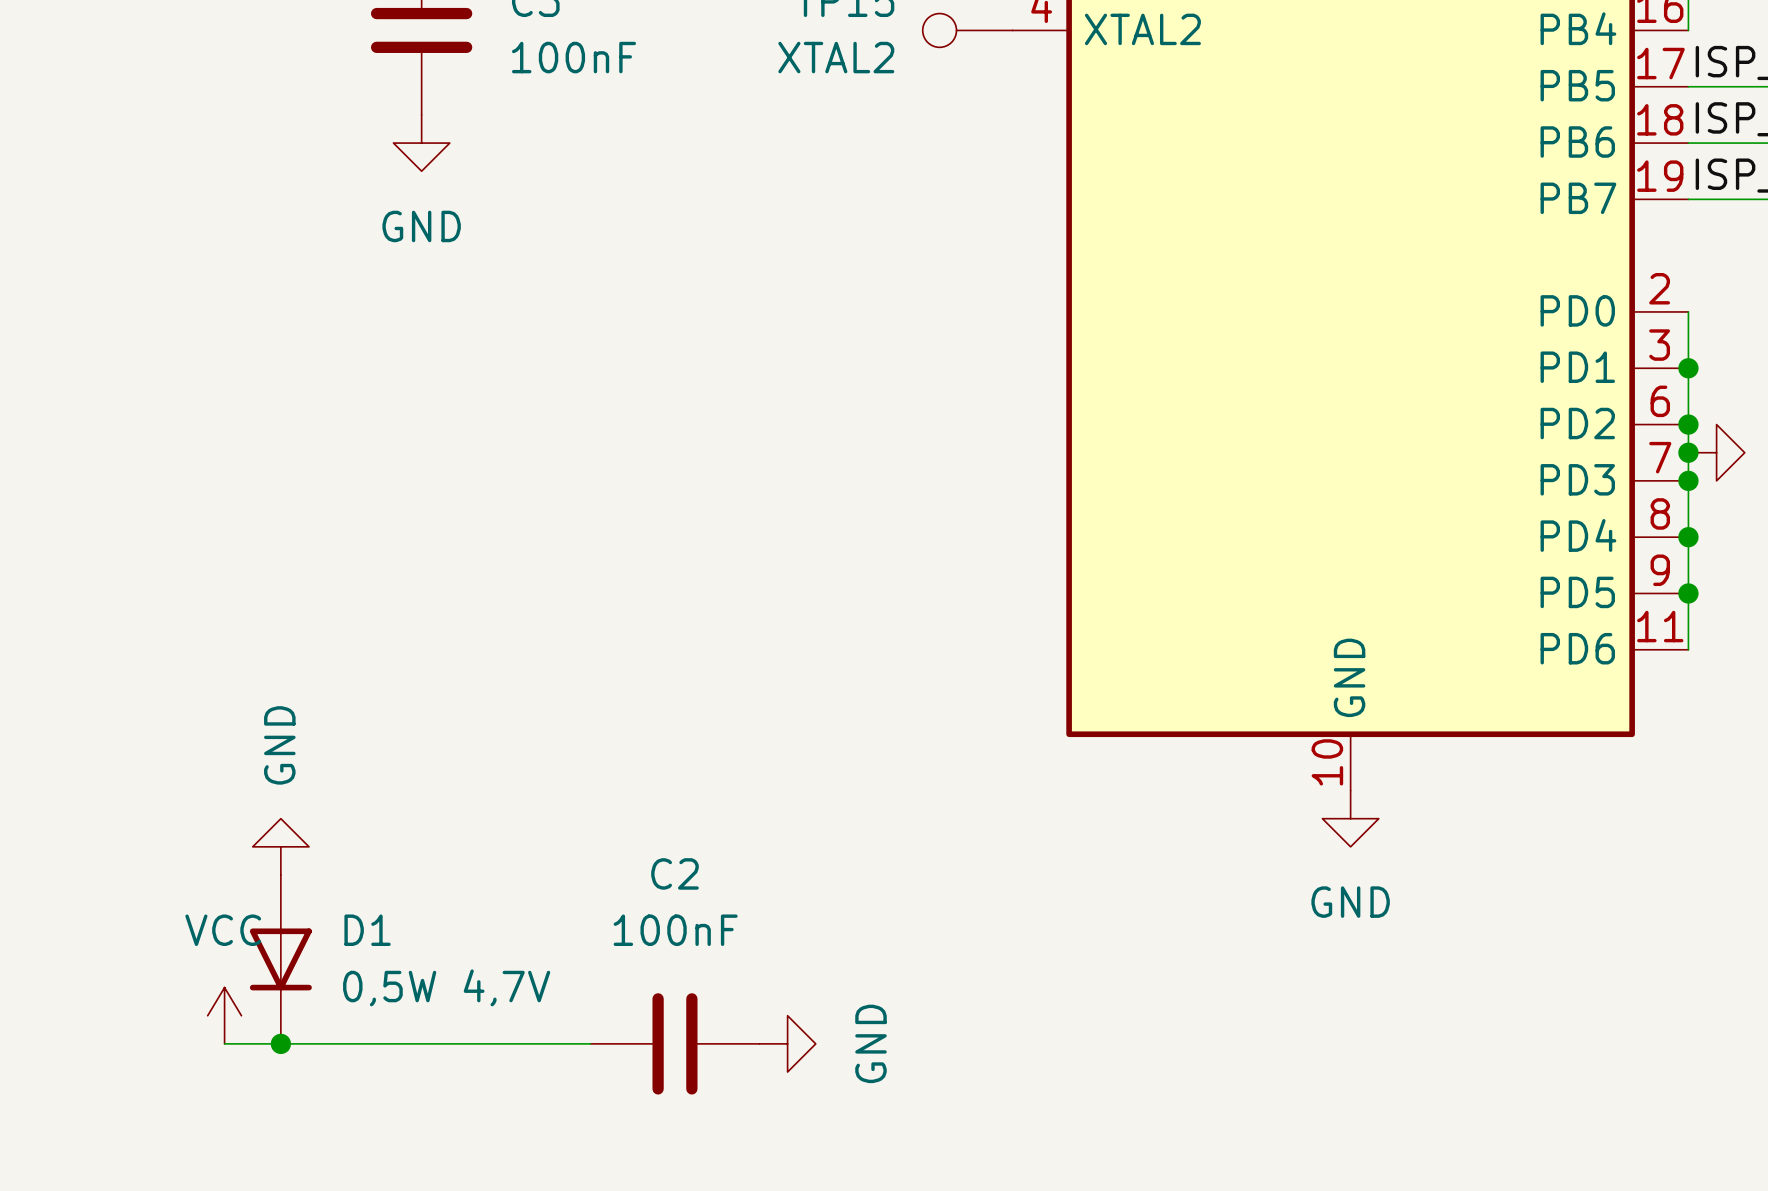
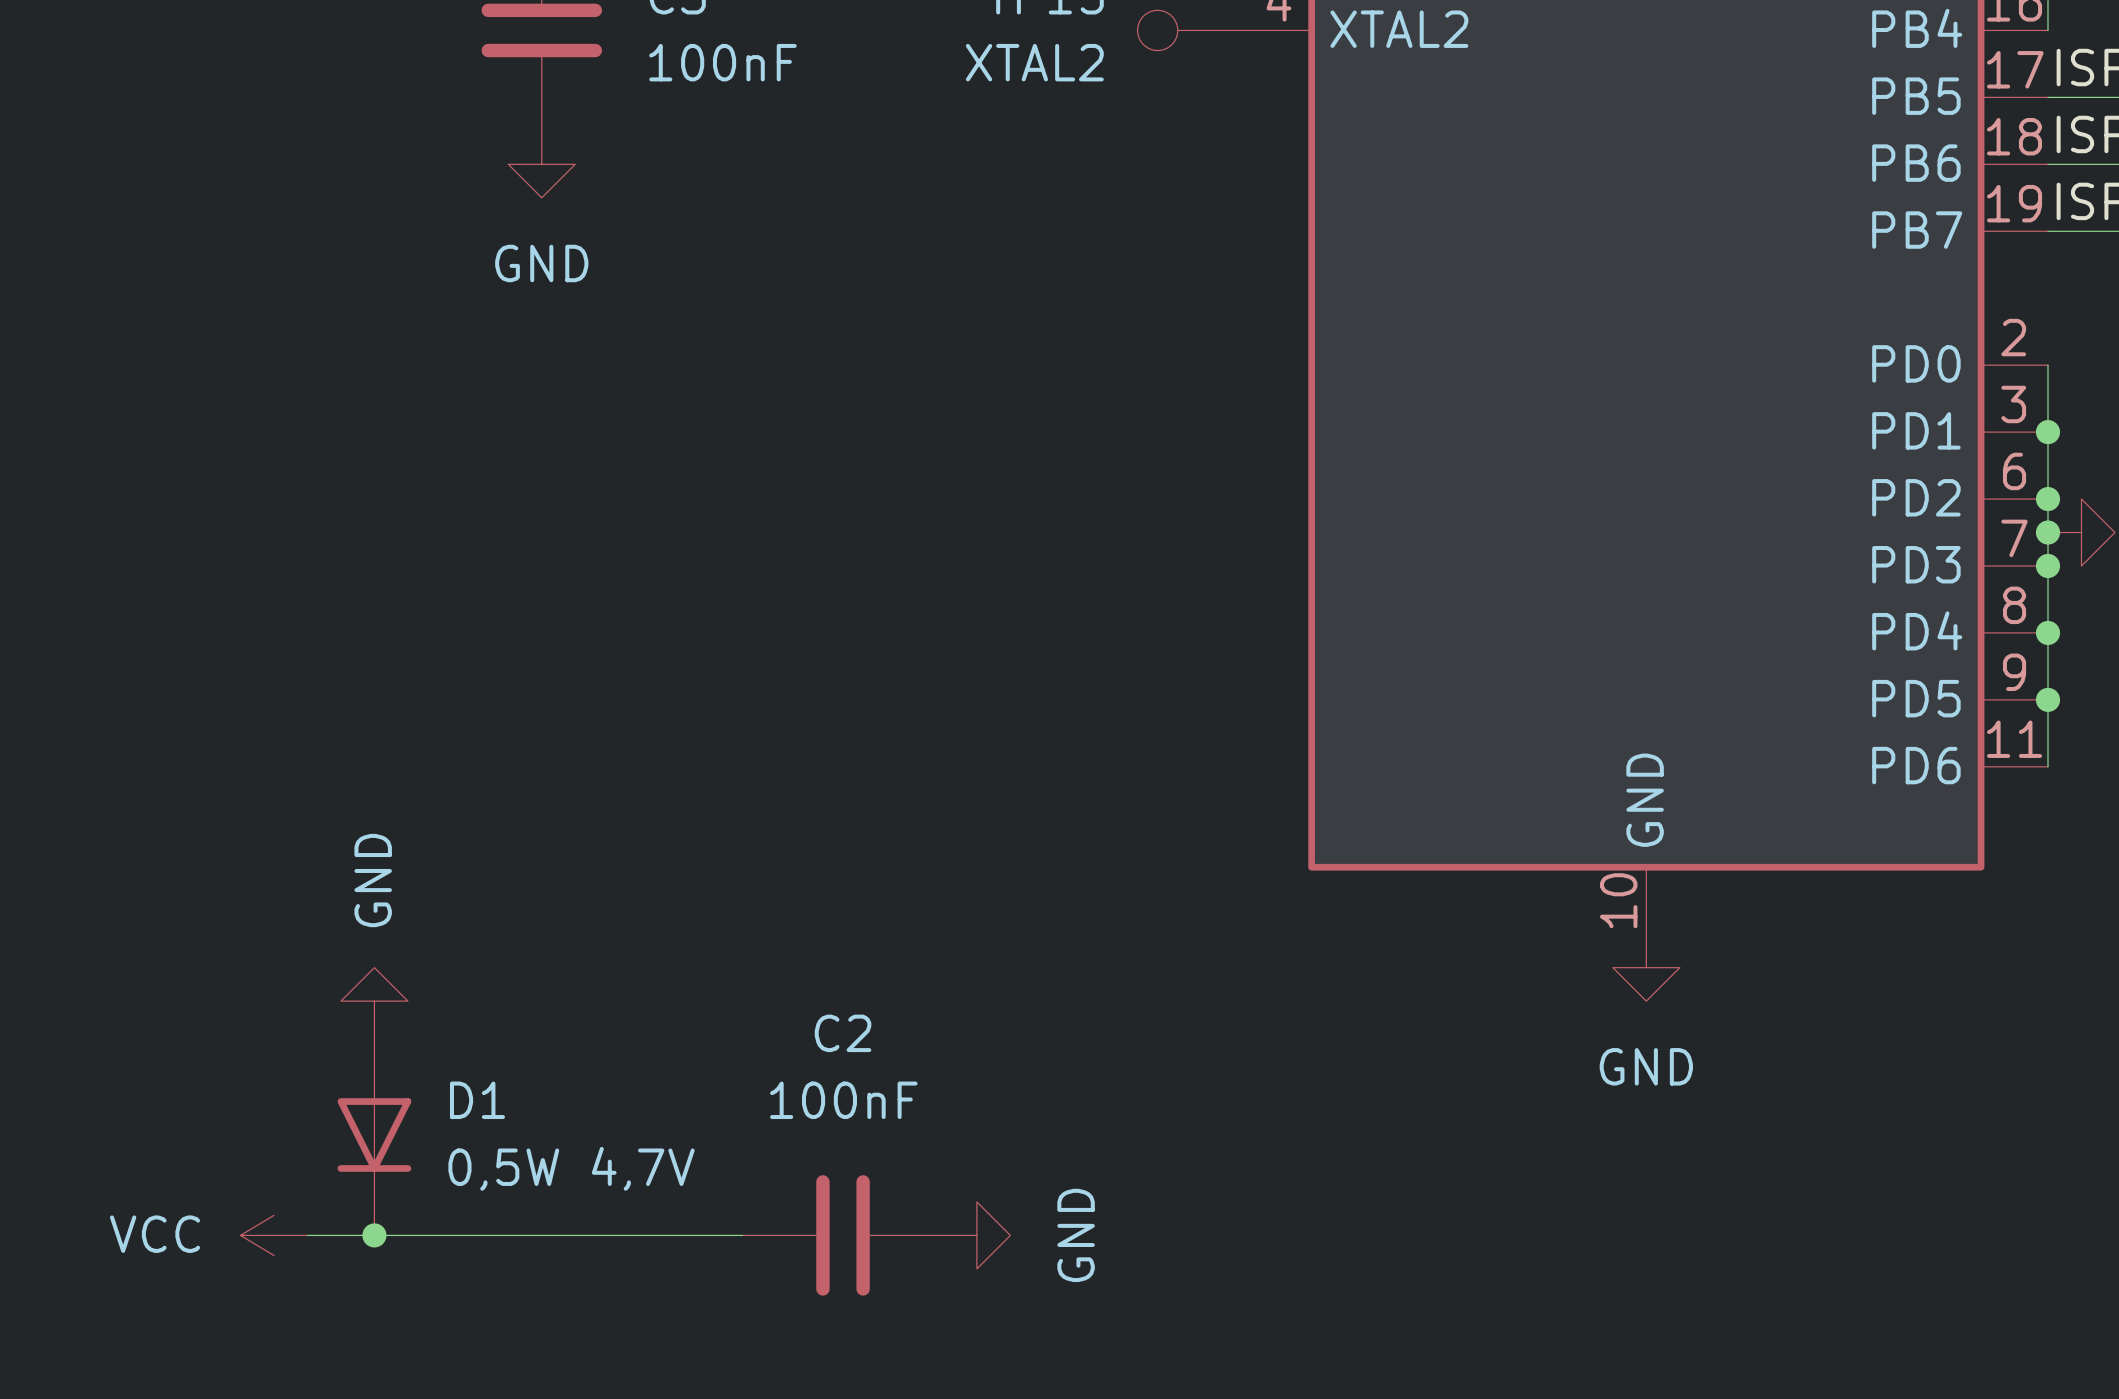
power symbol rotation: 0° (224, 1015) -> 90° counterclockwise (274, 1235)
power symbol position: VCC (224, 1015) -> VCC (274, 1235)

